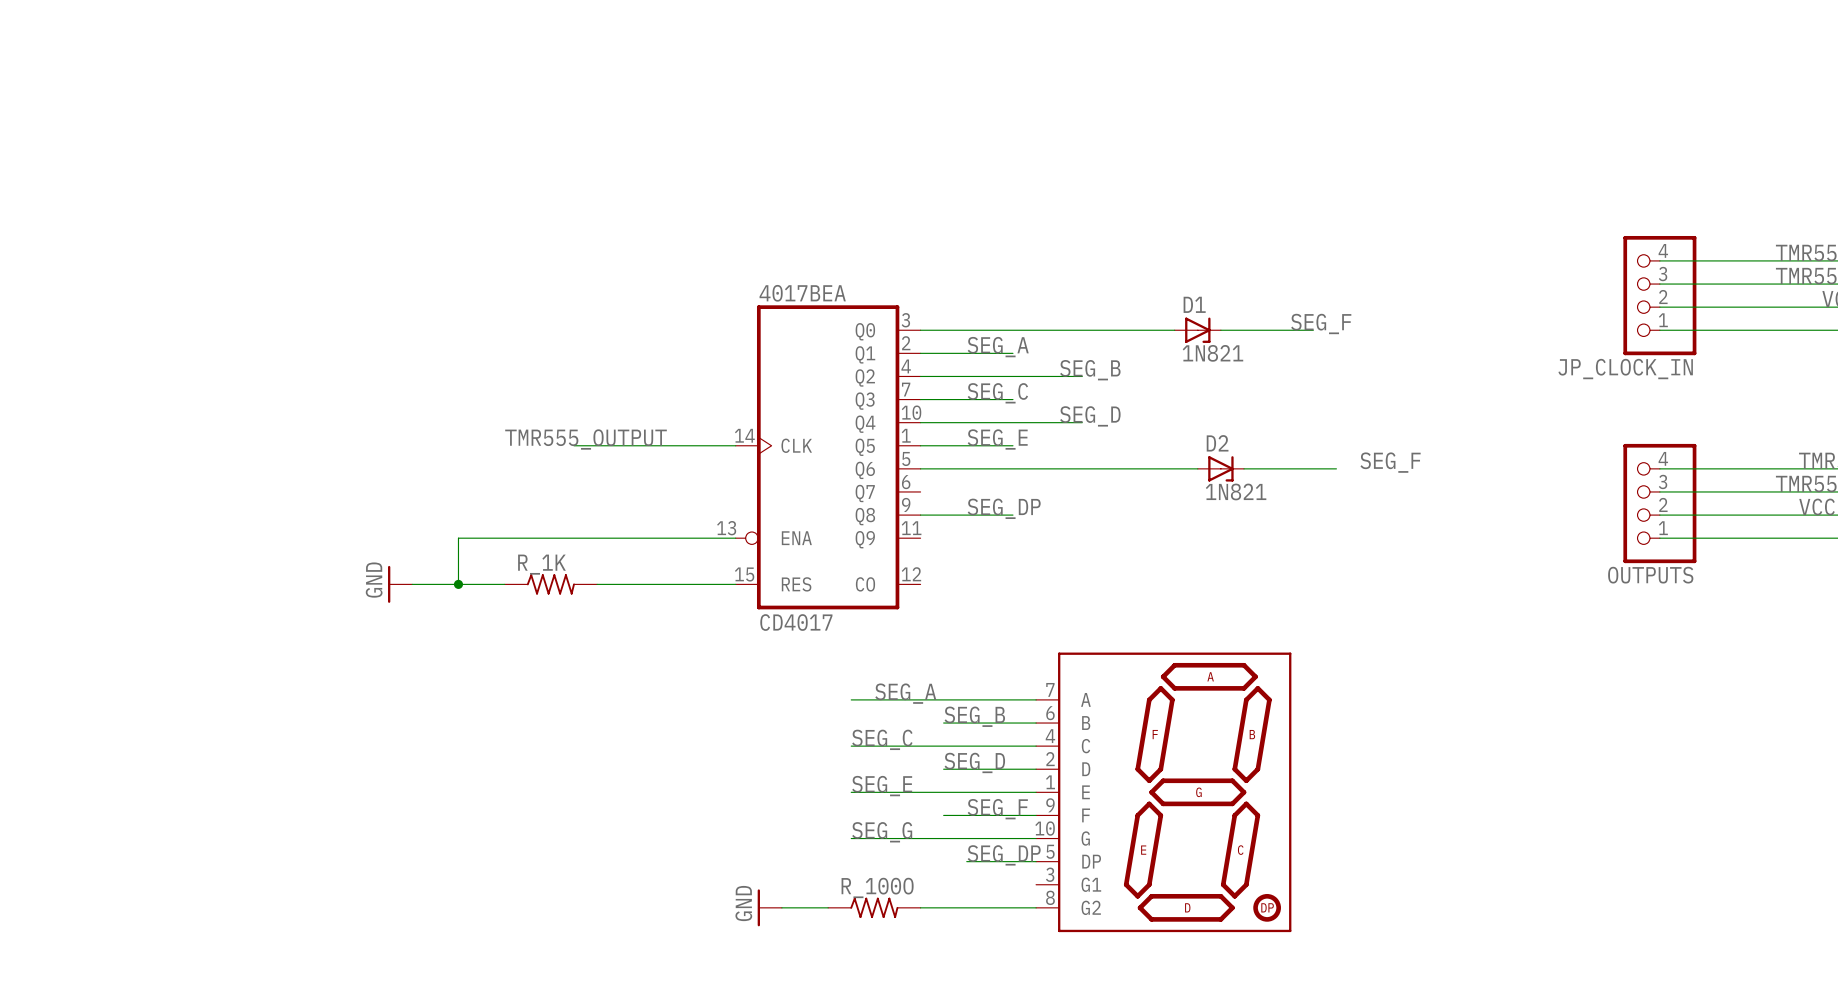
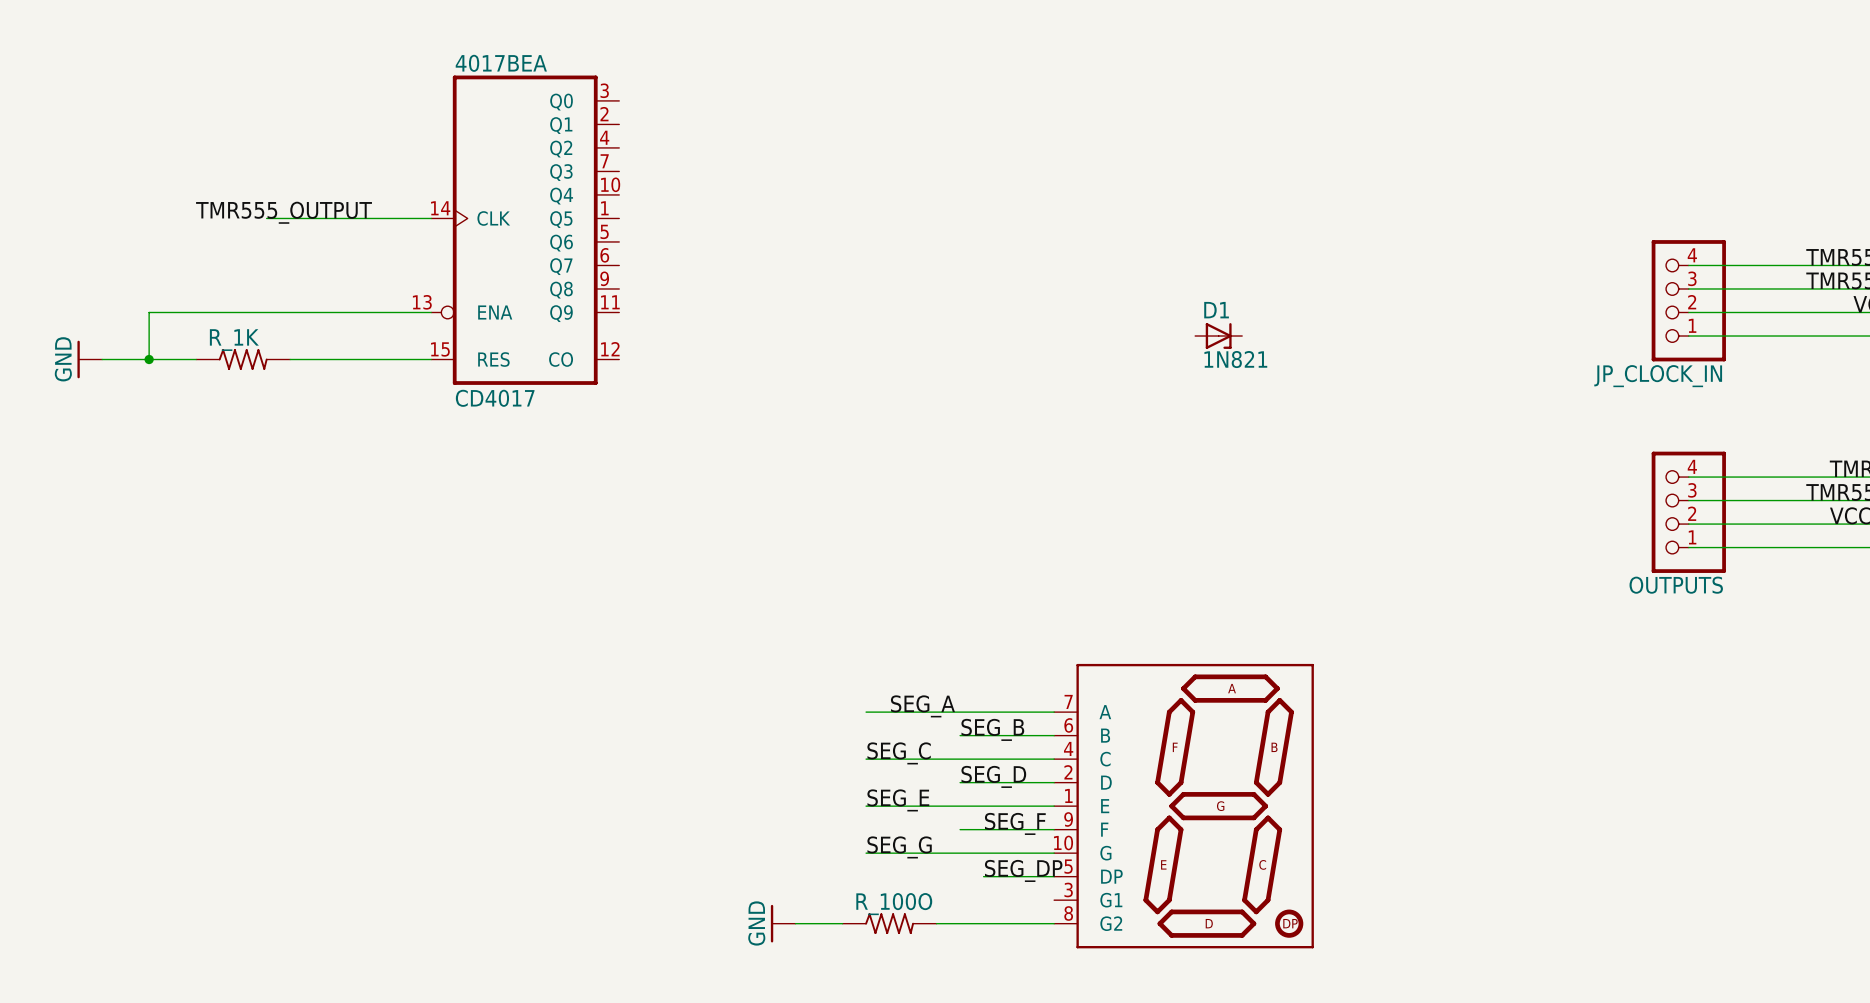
label: none -> TMR555_OUTPUT (284, 212)
wire: none -> (266, 218) (431, 218)
wire: none -> (431, 312) (149, 312) (149, 359)
label: SEG_F (1321, 323) -> none
wire: (920, 330) (1174, 330) -> none
wire: (1220, 330) (1313, 330) -> none
label: SEG_A (998, 347) -> none
power symbol: none -> GND (89, 359)
wire: none -> (102, 359) (196, 359)
junction: none -> (149, 359)
wire: none -> (290, 359) (431, 359)
wire: (920, 353) (1012, 353) -> none
label: SEG_B (1090, 370) -> none
wire: (920, 376) (1082, 376) -> none
label: SEG_C (997, 393) -> none
wire: (920, 399) (1012, 399) -> none
label: SEG_D (1090, 416) -> none
wire: (920, 422) (1082, 422) -> none
label: TMR555_OUTPUT (586, 439) -> none
label: SEG_E (997, 439) -> none
wire: (574, 445) (735, 445) -> none
wire: (920, 445) (1012, 445) -> none
4017BEA position: (828, 457) -> (525, 230)
label: SEG_F (1390, 462) -> none
wire: (920, 468) (1197, 468) -> none
D2: 1N821 (1220, 468) -> none
wire: (1244, 468) (1336, 468) -> none
label: SEG_DP (1004, 508) -> none
wire: (920, 515) (1012, 515) -> none
wire: (735, 538) (458, 538) (458, 584) -> none
power symbol: GND (400, 584) -> none
wire: (412, 584) (504, 584) -> none
junction: (458, 584) -> none
R_1K position: (550, 584) -> (243, 359)
wire: (597, 584) (735, 584) -> none

